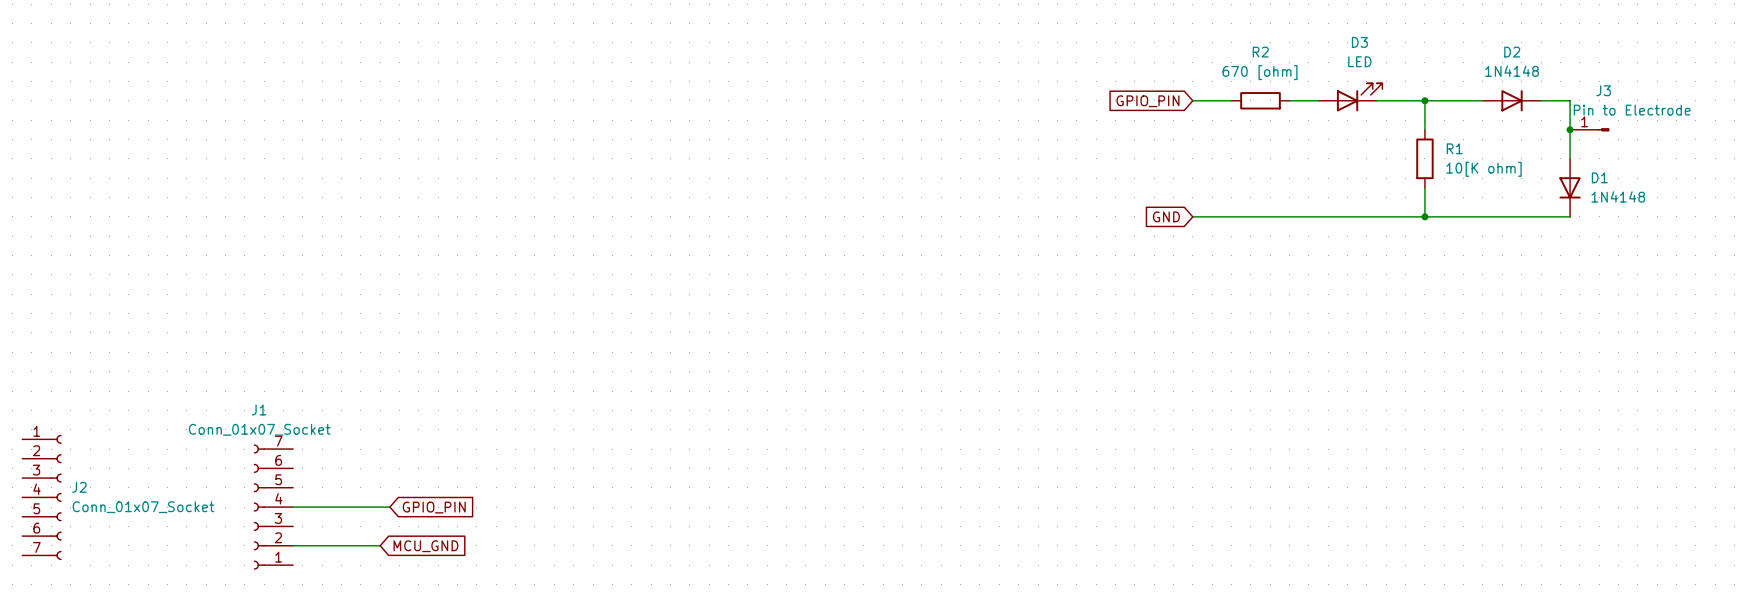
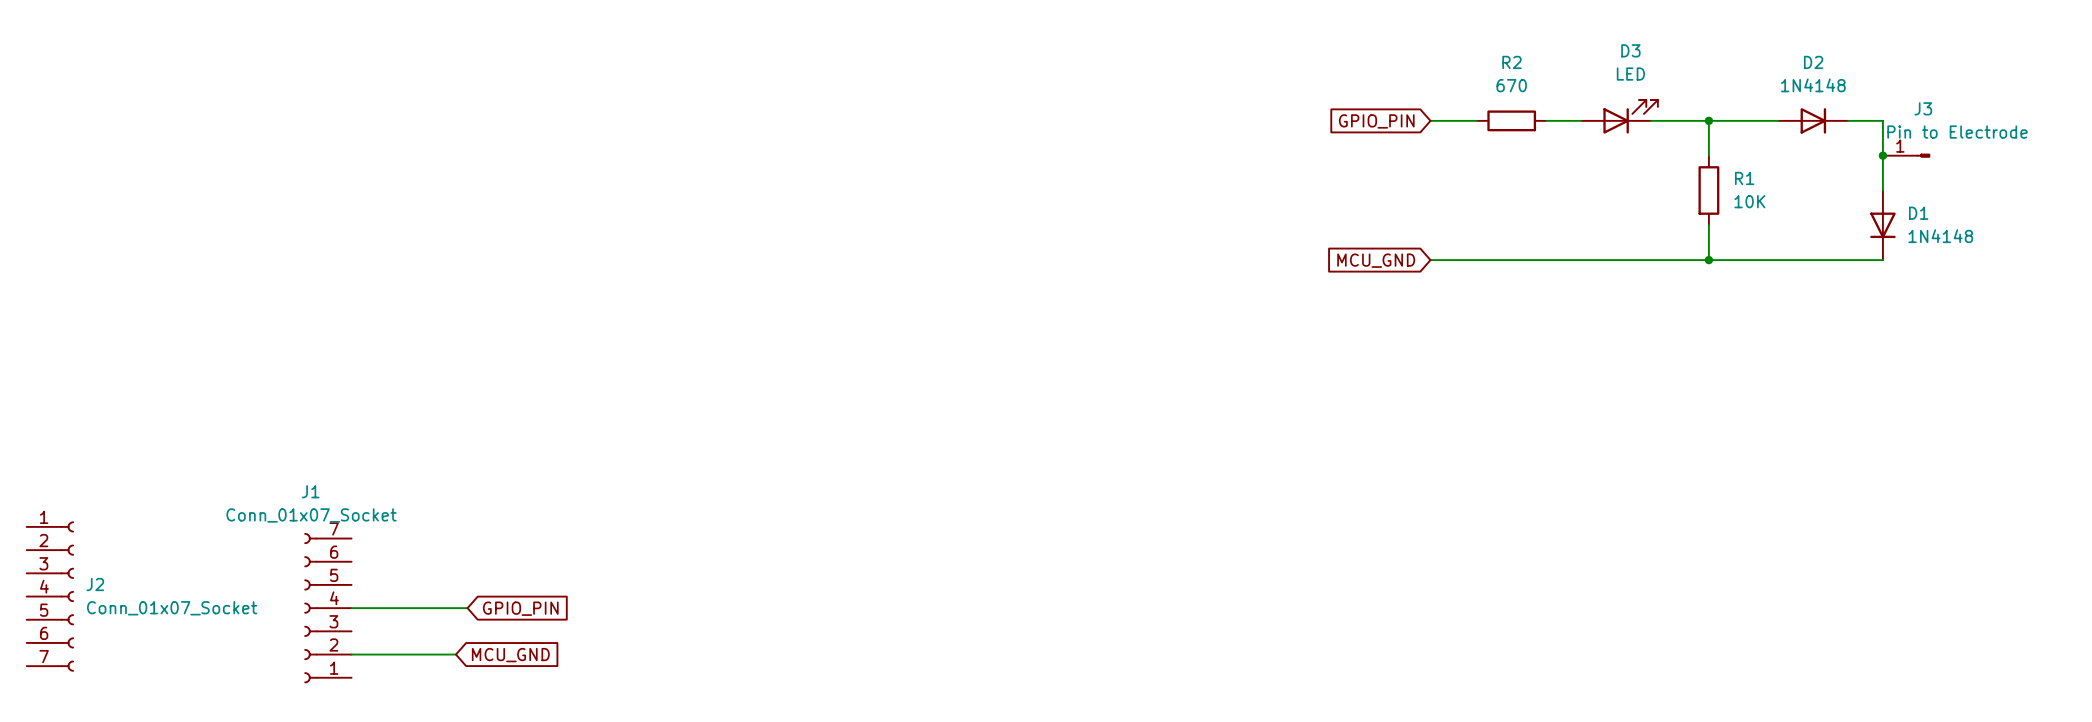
R2 value: 670 [ohm] (1260, 72) -> 670 (1511, 85)
R1 value: 10[K ohm] (1483, 169) -> 10K (1749, 201)
global label: GND (1166, 216) -> MCU_GND (1376, 260)

